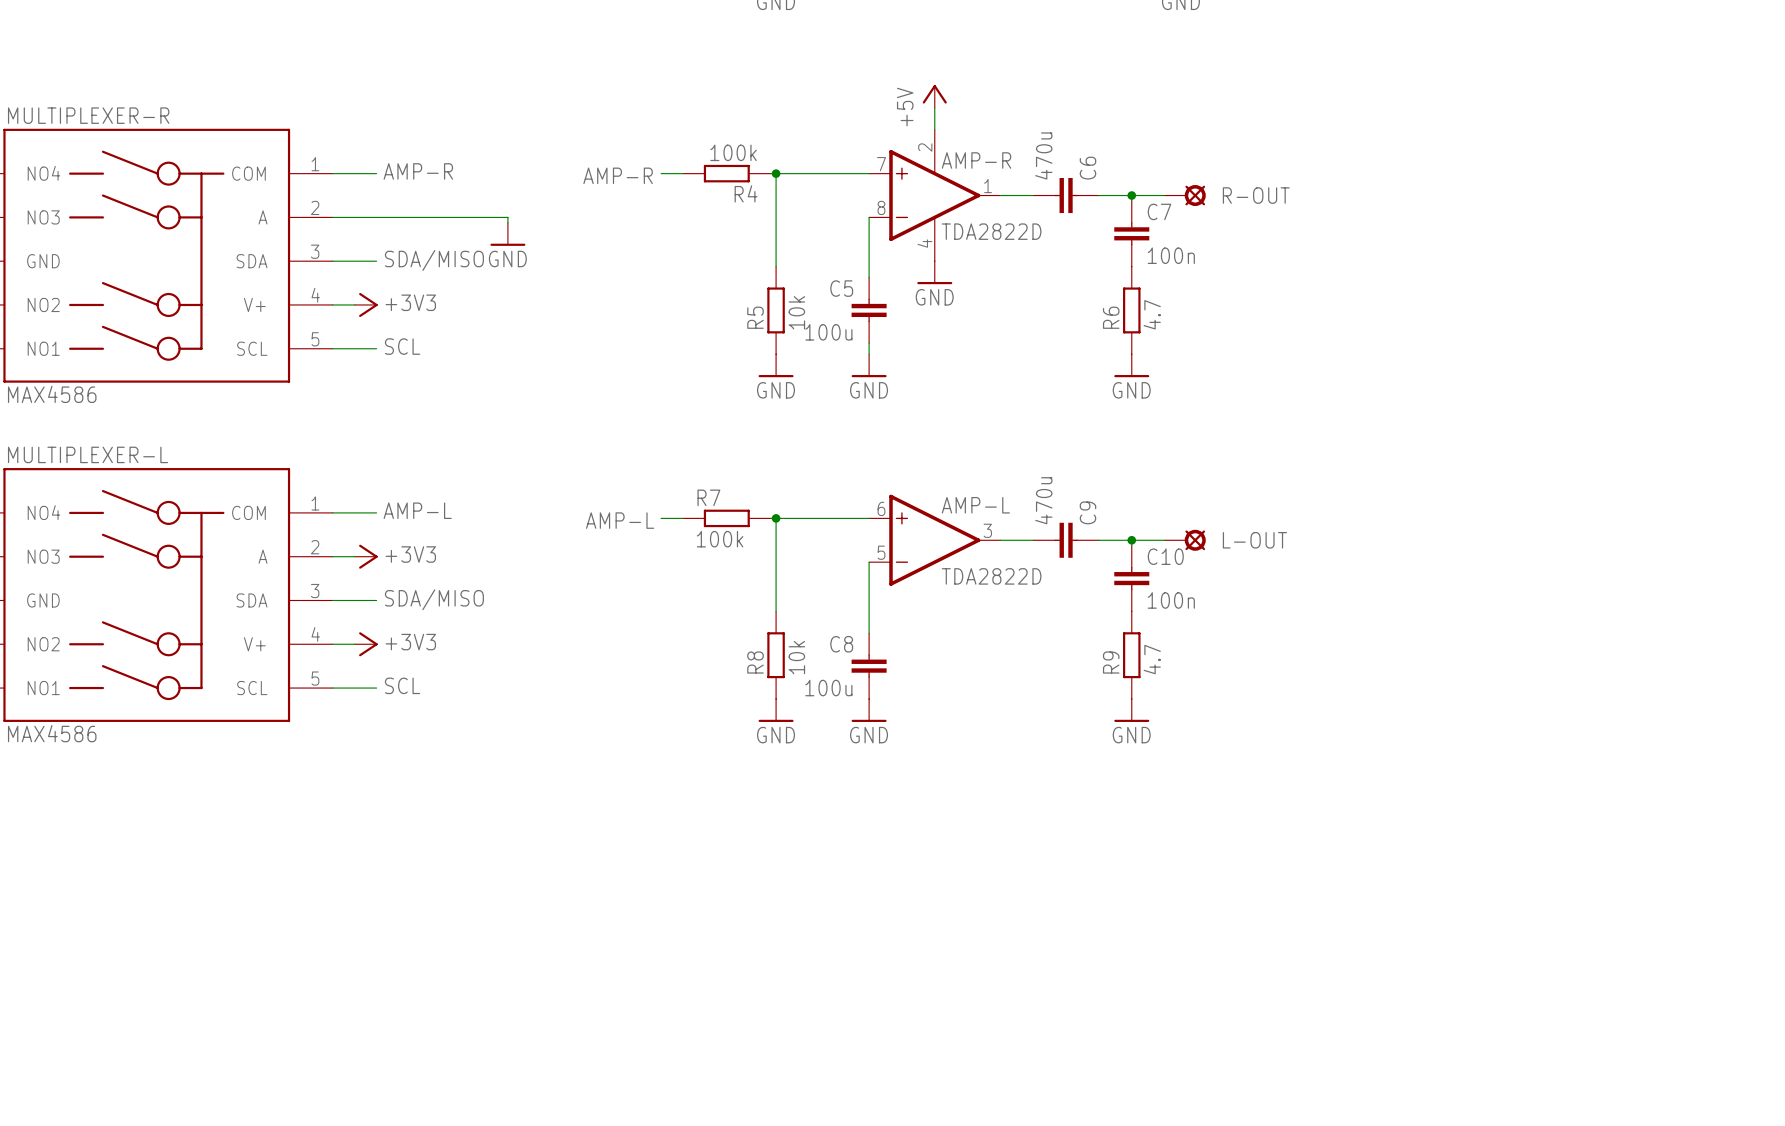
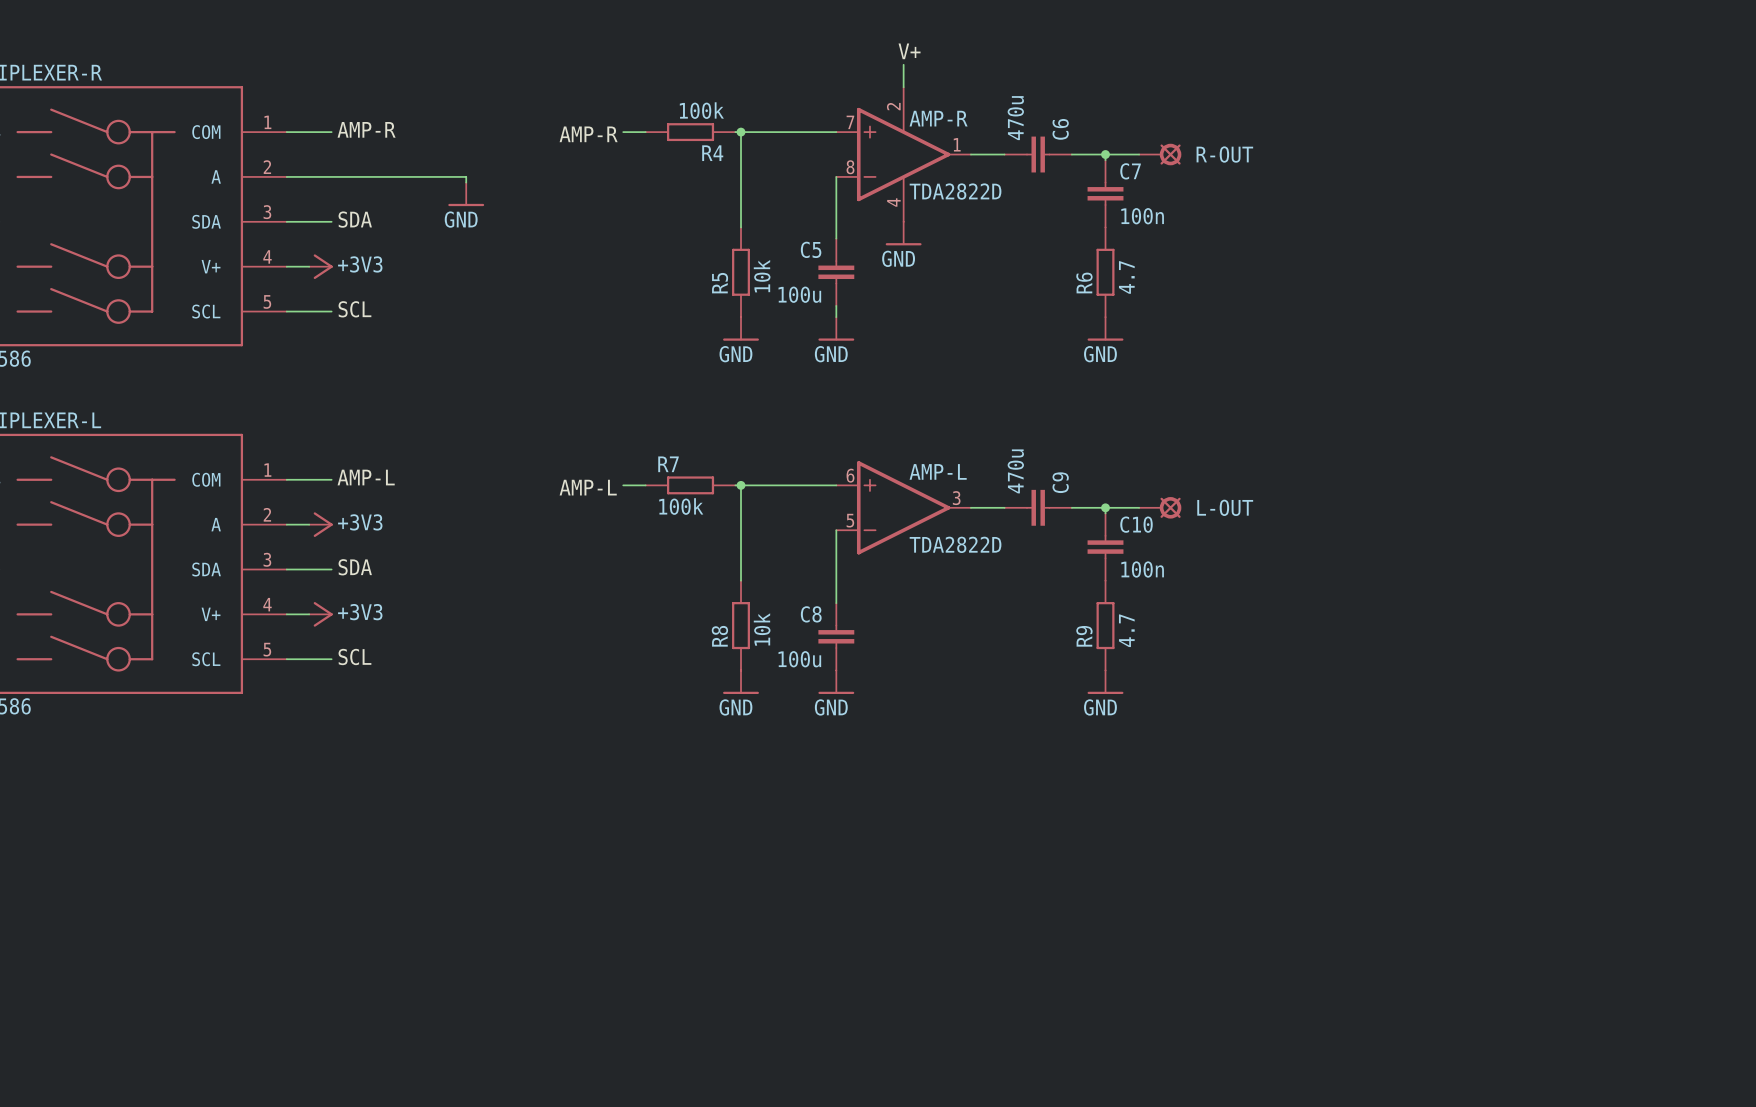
label: none -> V+ (909, 51)
power symbol: +5V (934, 96) -> none
label: SDA/MISO (434, 260) -> SDA (355, 219)
label: SDA/MISO (434, 599) -> SDA (355, 567)

